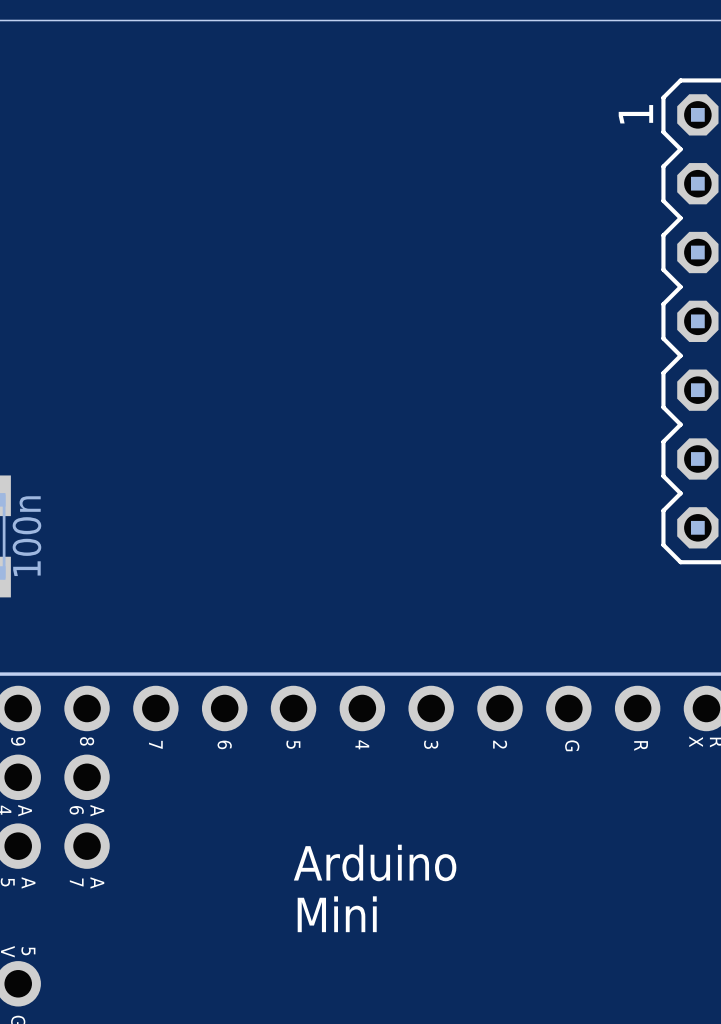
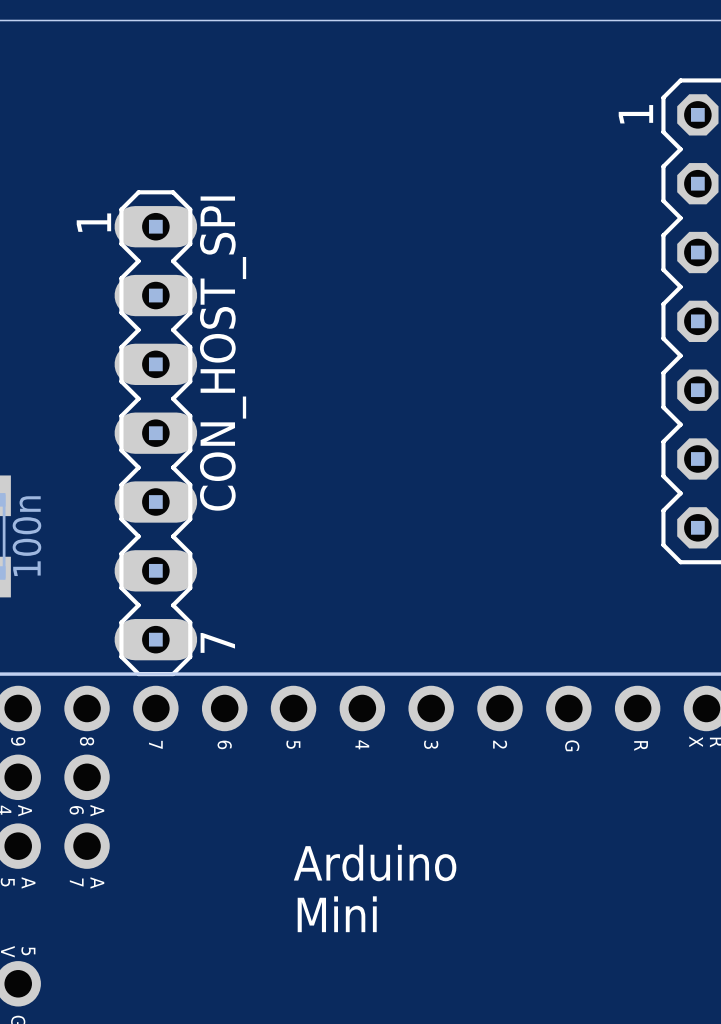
CON_HOST_SPI: none -> (155, 433)

